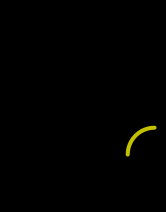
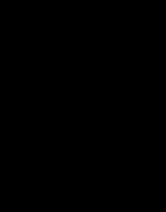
board edge: (154, 127) (144, 129) (135, 135) (129, 144) (127, 154) -> none

